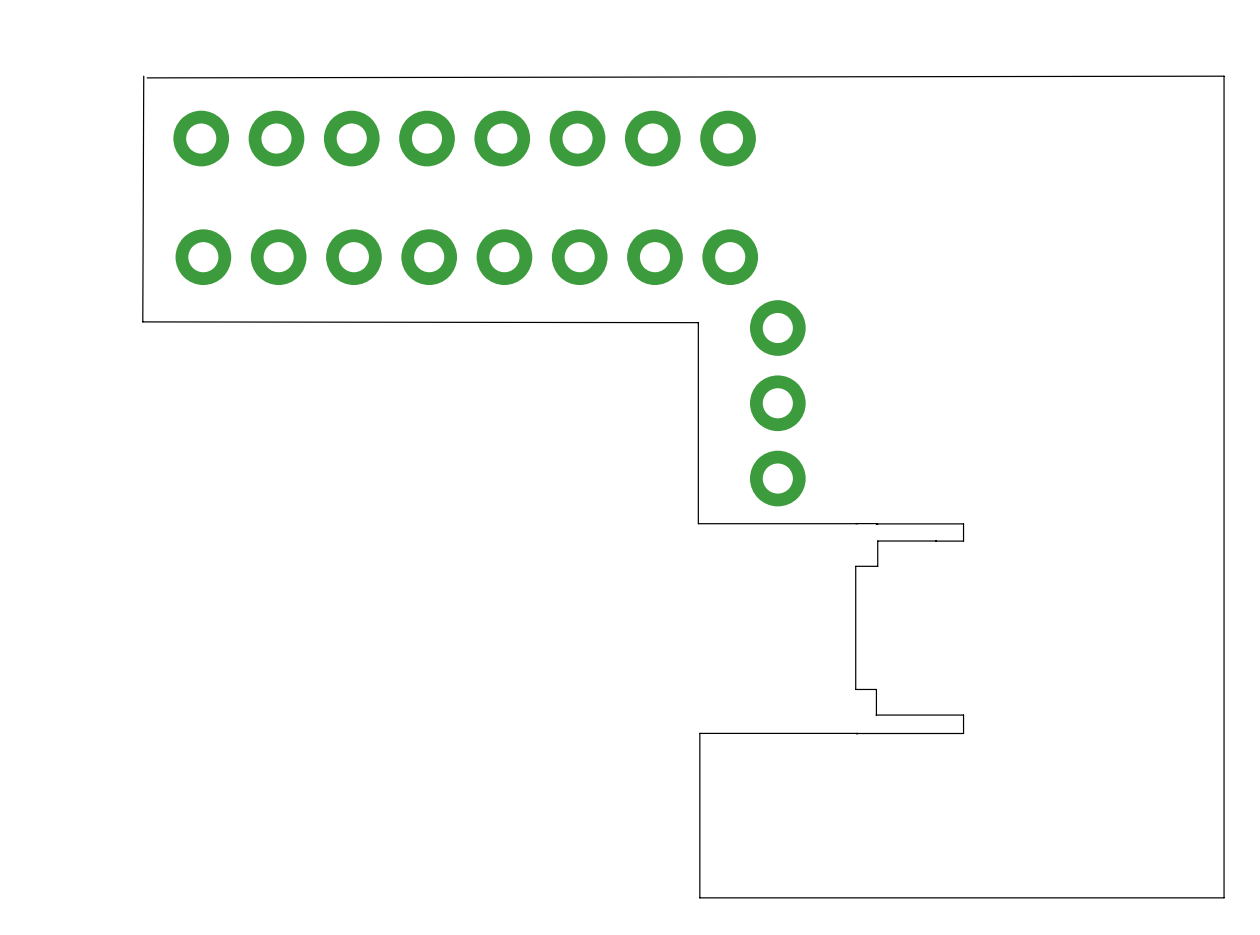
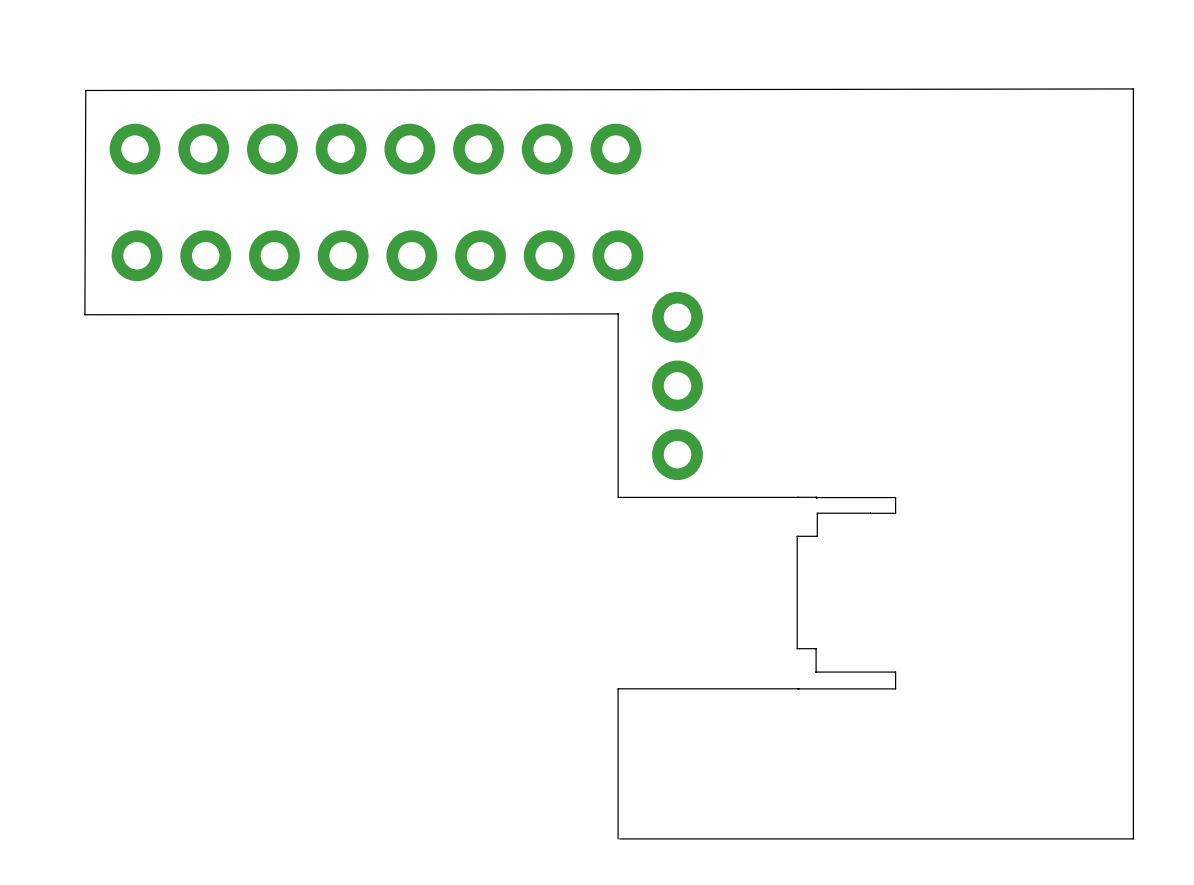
board edge: (143, 76) (142, 321) (698, 322) (698, 523) -> (85, 90) (84, 314) (618, 313) (618, 497) (653, 497)
board edge: (1224, 76) (147, 77) -> (1133, 88) (85, 90)
part: (464, 138) -> none
part: none -> (375, 149)
part: (466, 257) -> none
part: none -> (377, 255)
part position: (777, 403) -> (677, 385)
board edge: (699, 733) (699, 897) -> (654, 688) (618, 688) (618, 838)
board edge: none -> (654, 838) (619, 838)

